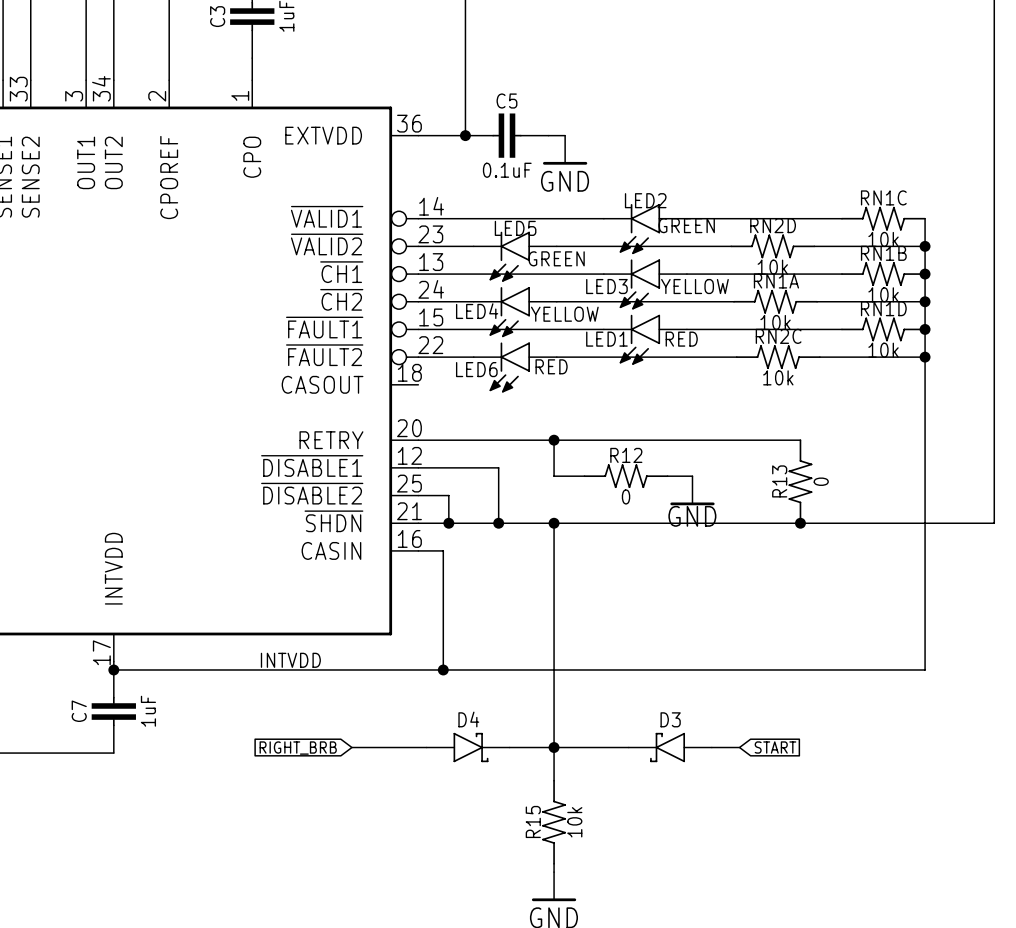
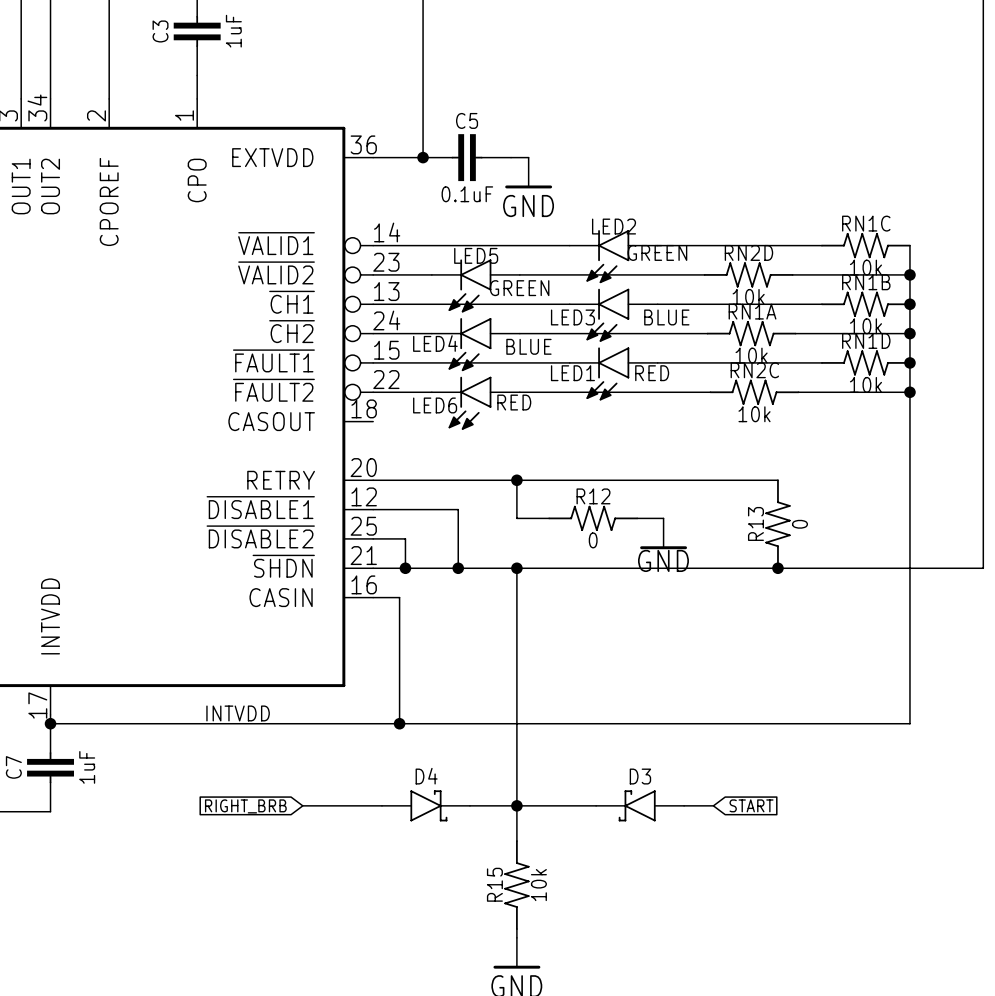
LED3 value: YELLOW (694, 286) -> BLUE (666, 317)
LED4 value: YELLOW (564, 314) -> BLUE (528, 346)

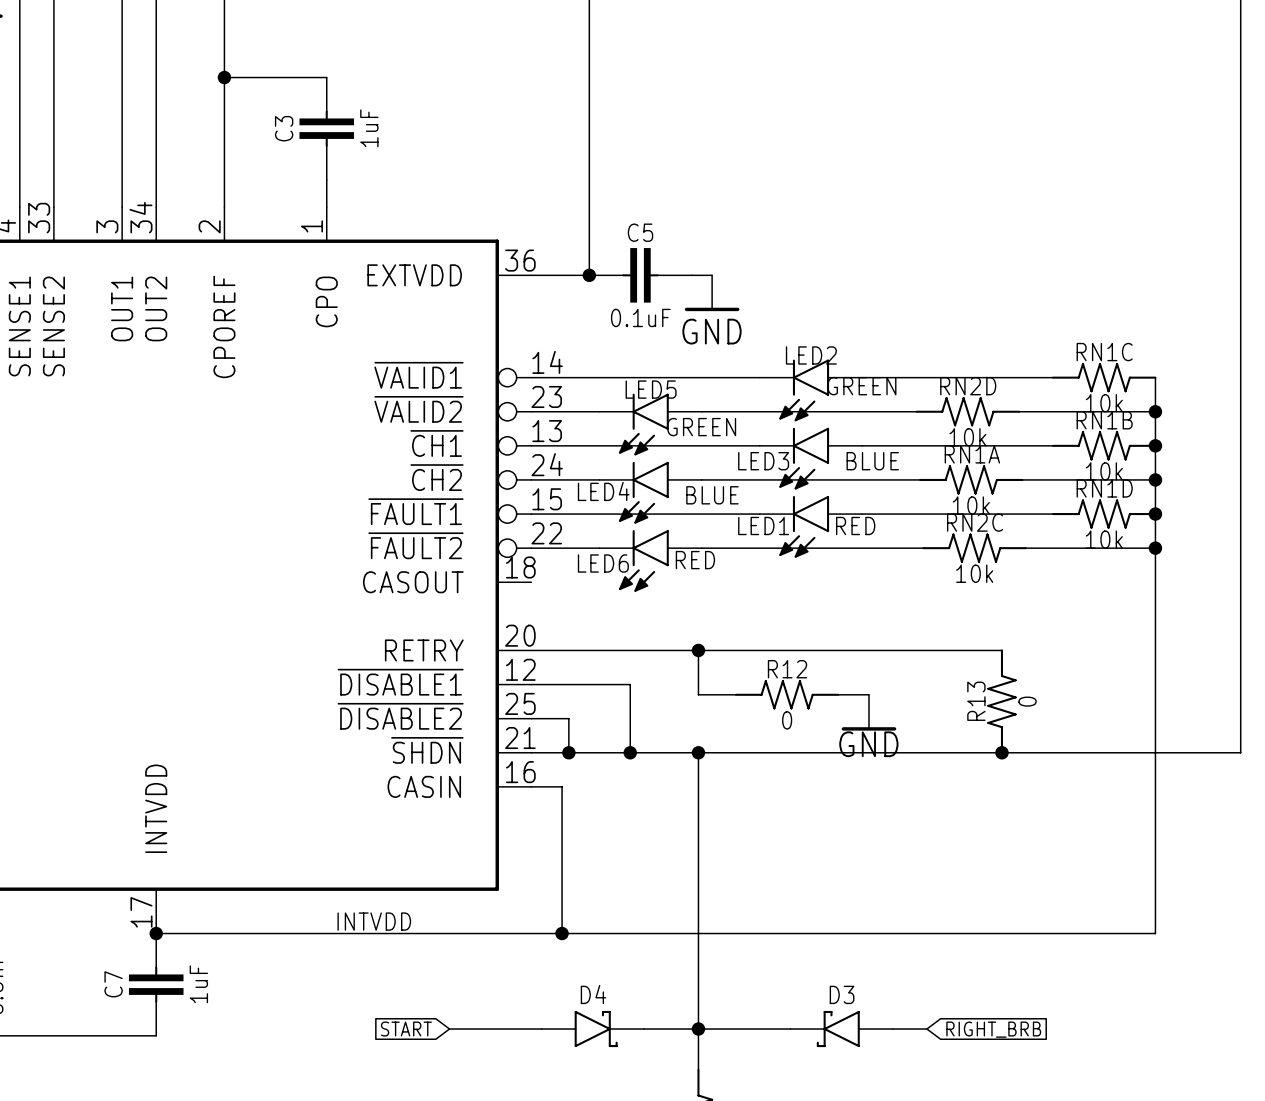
global label: START (751, 805) -> RIGHT_BRB (993, 1029)
global label: RIGHT_BRB (245, 806) -> START (406, 1029)

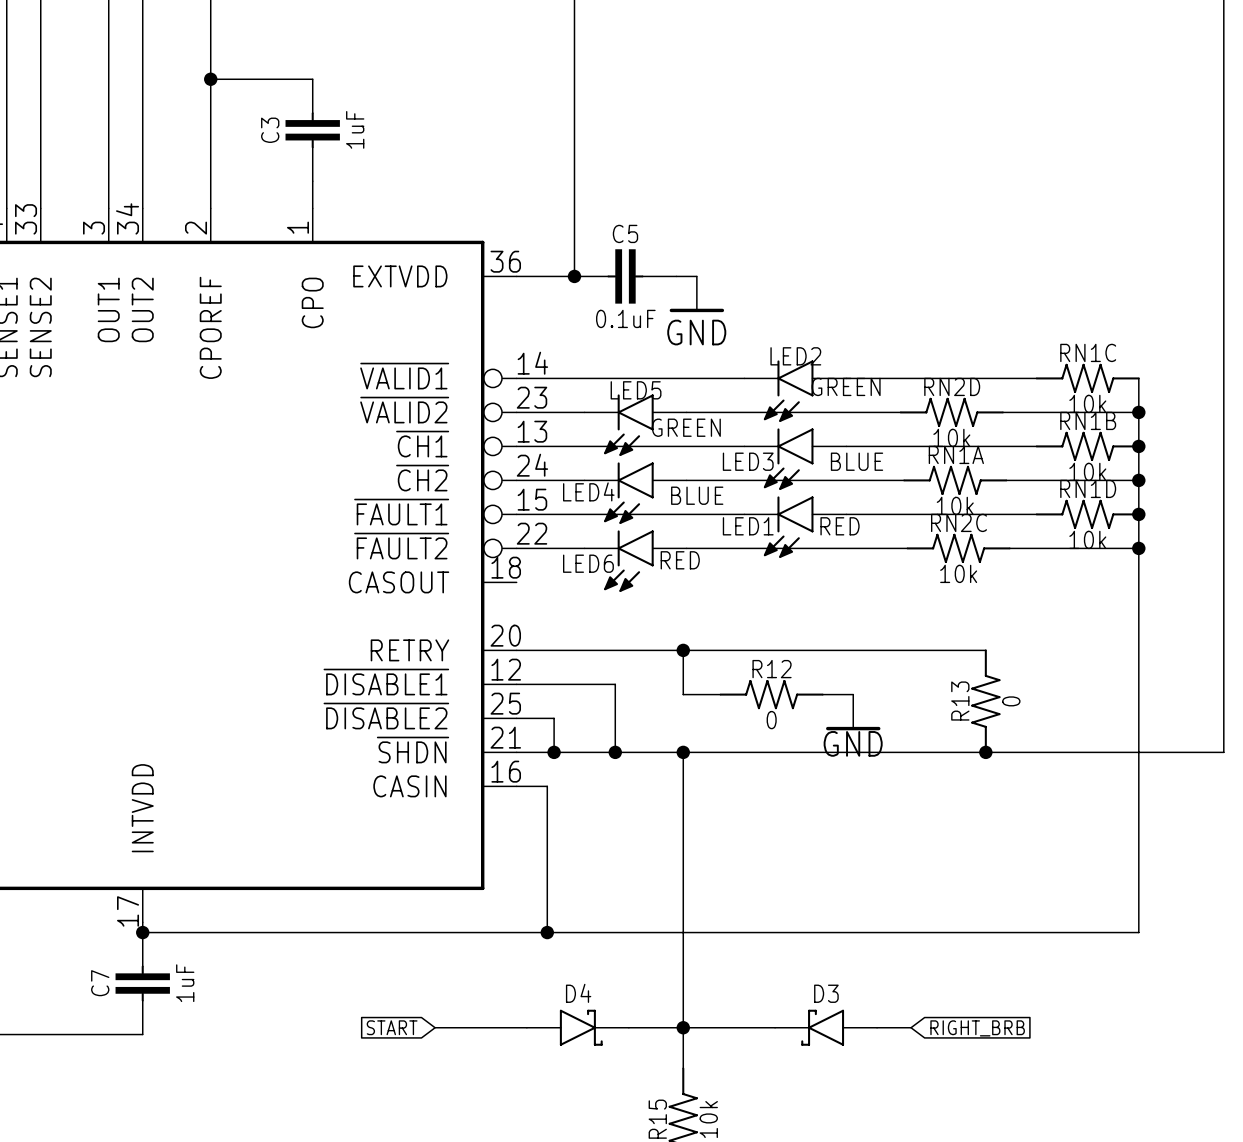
label: INTVDD (374, 921) -> none

